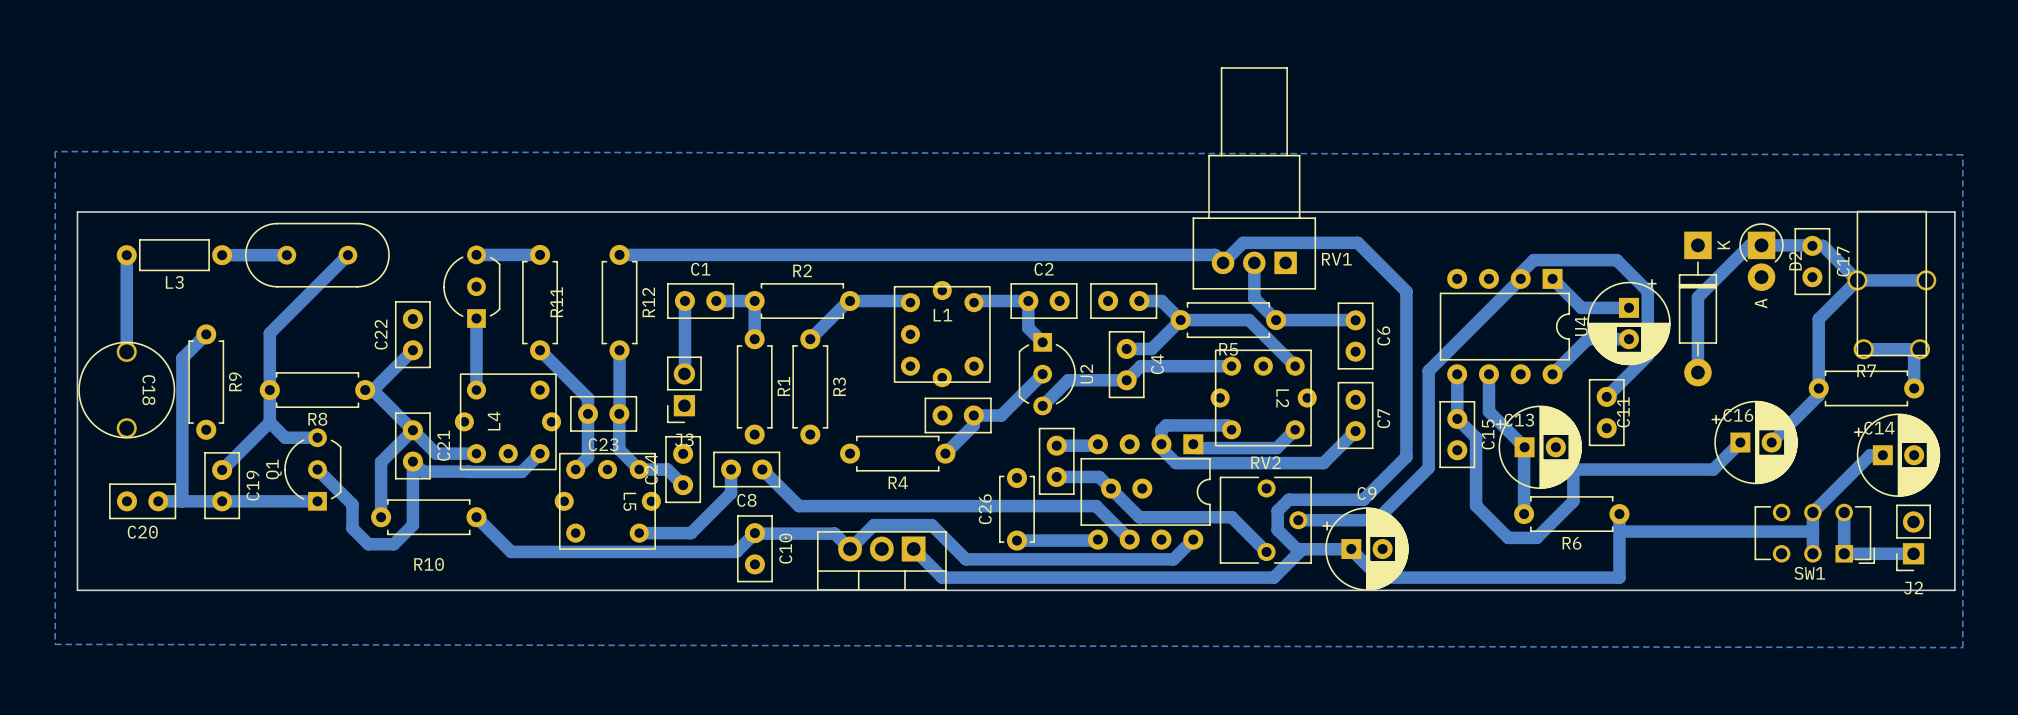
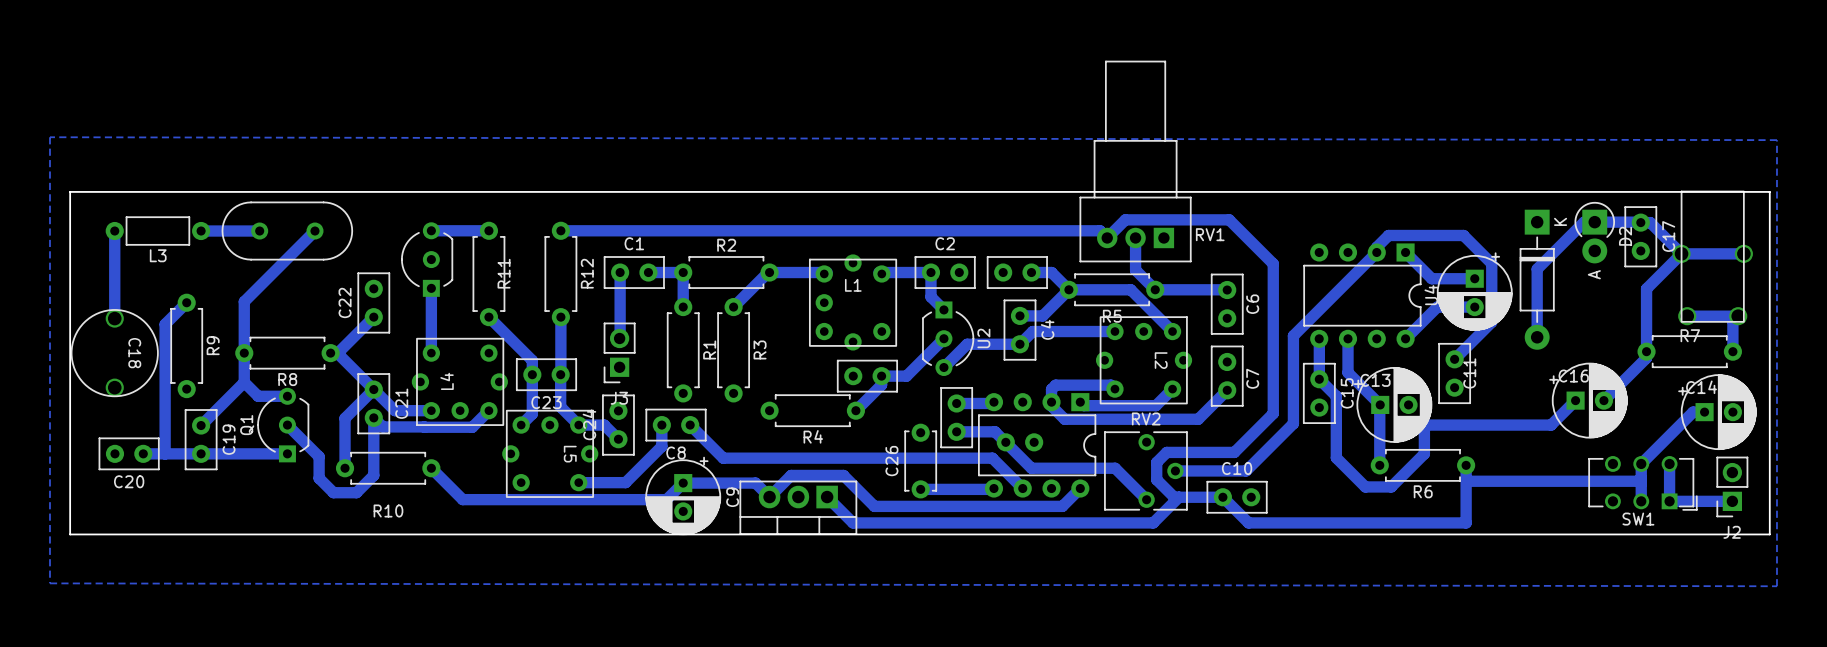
C10 rotation: 0° (754, 548) -> 90° clockwise (1237, 497)
C10 position: (754, 548) -> (1237, 497)
C10 name position: C10 (785, 548) -> C10 (1237, 468)
C9 rotation: 0° (1365, 549) -> 90° clockwise (683, 495)
C9 position: (1365, 549) -> (683, 495)

